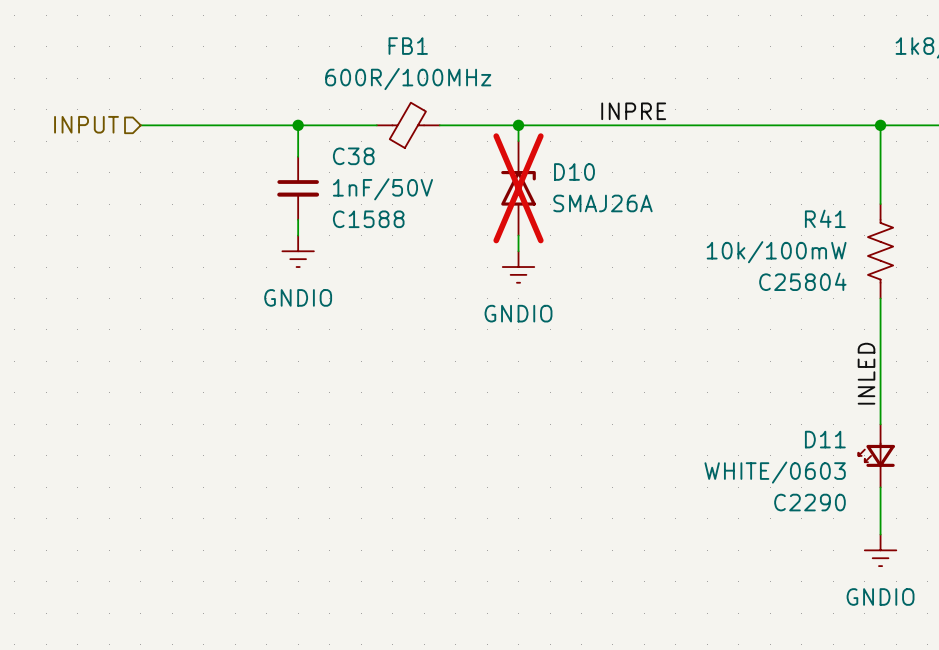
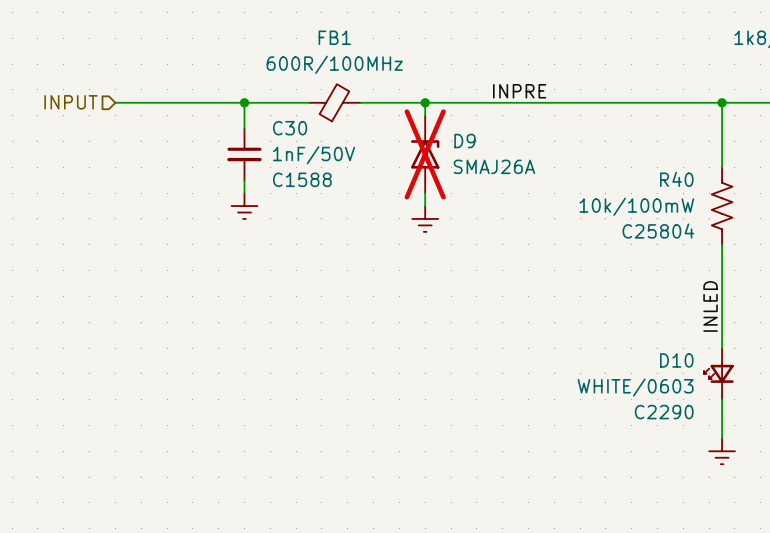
C38 name: C38 (353, 156) -> C30 (290, 128)
D10 name: D10 (574, 171) -> D9 (464, 141)
R41 name: R41 (825, 218) -> R40 (676, 179)
power symbol text: GNDIO (298, 297) -> none
power symbol text: GNDIO (518, 313) -> none
D11 name: D11 (825, 439) -> D10 (676, 360)
power symbol text: GNDIO (880, 596) -> none

